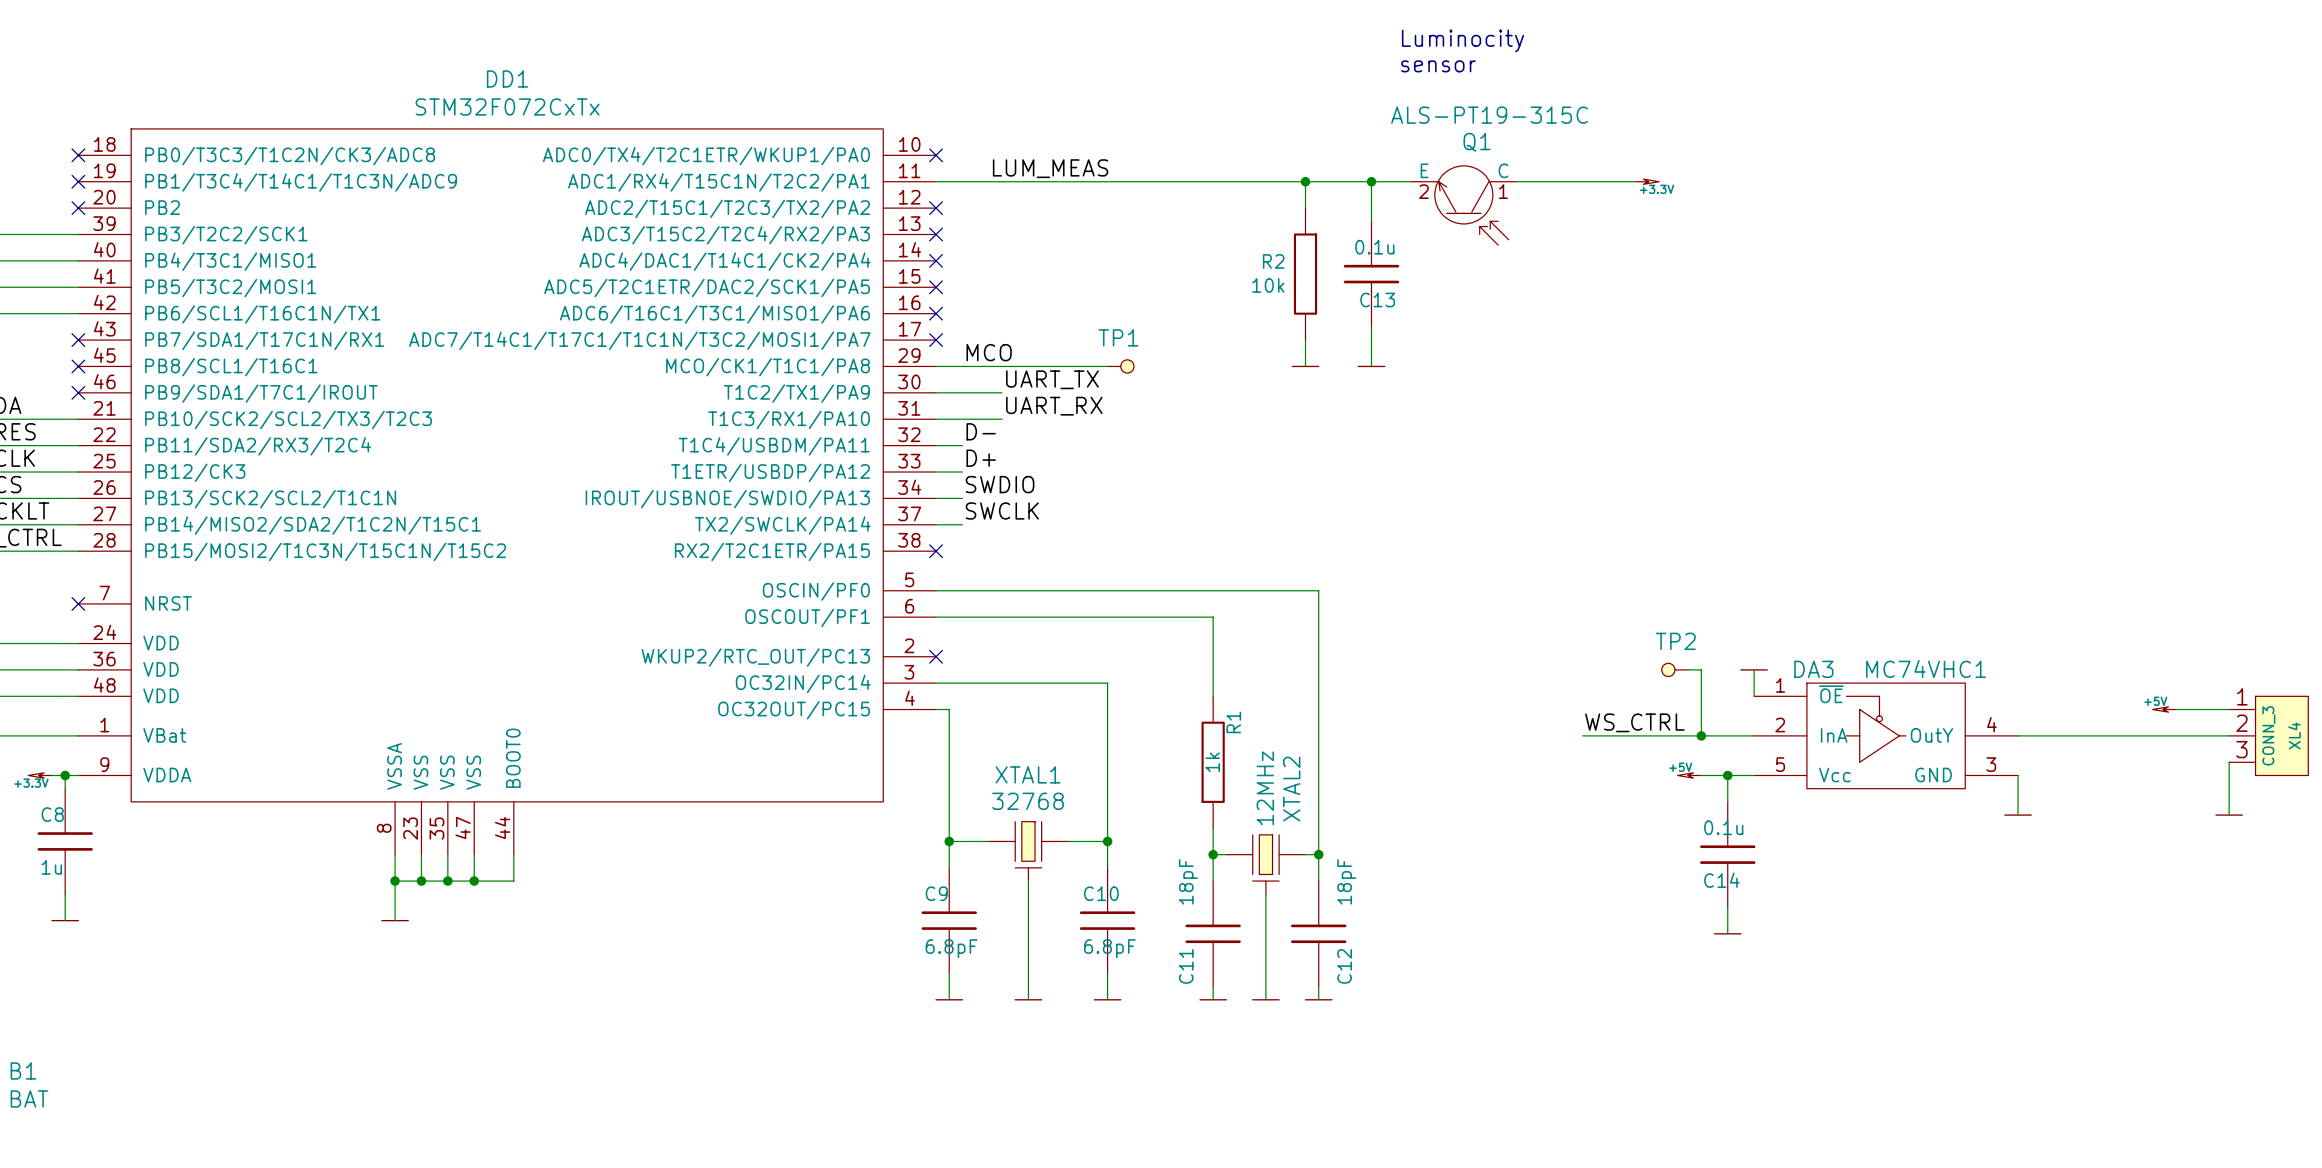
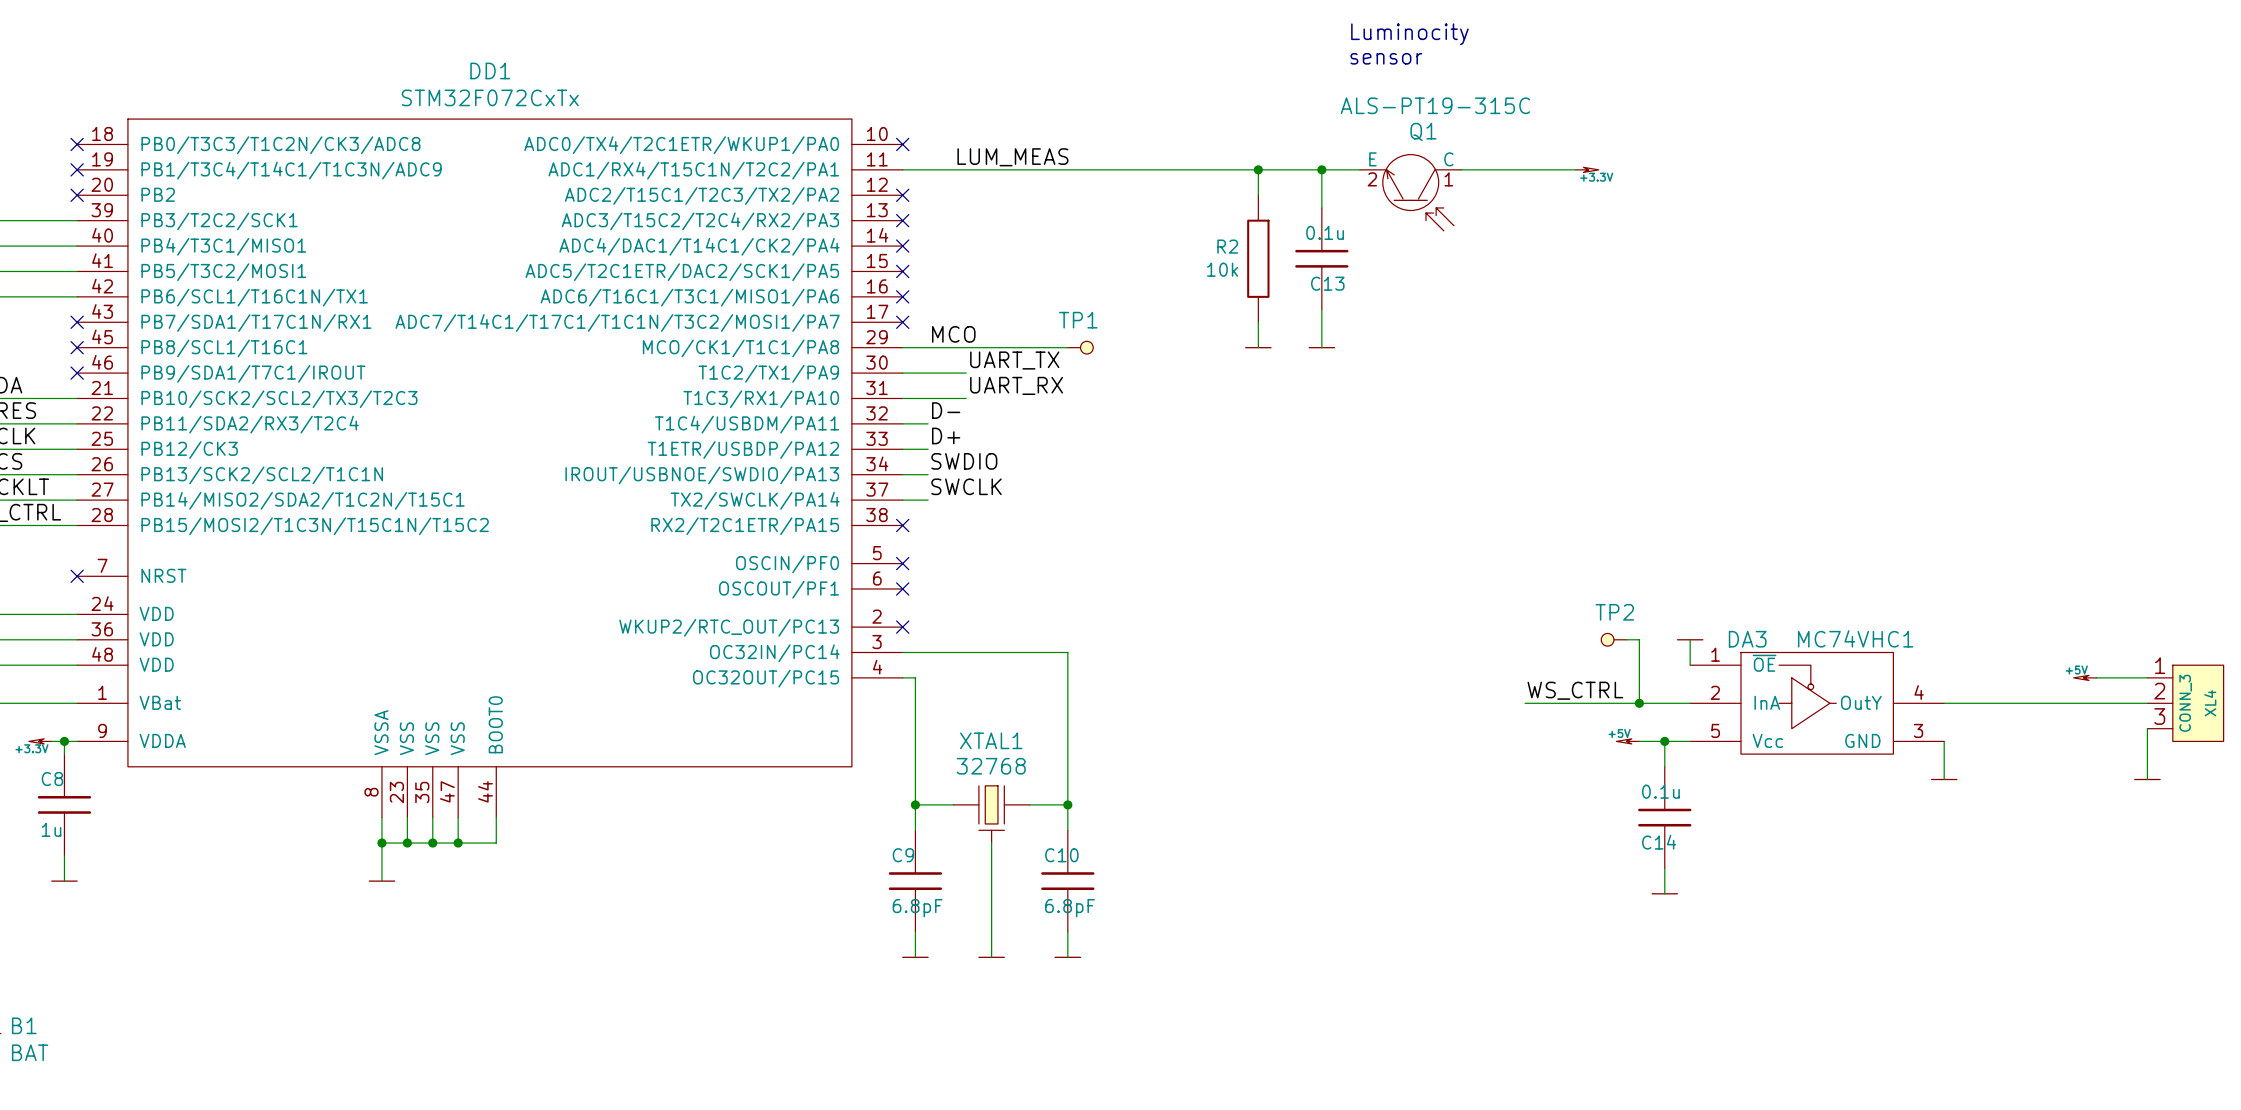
wire: (936, 590) (1318, 590) (1318, 881) -> none
no-connect mark: none -> (902, 563)
wire: (936, 617) (1213, 617) (1213, 696) -> none
no-connect mark: none -> (902, 588)
R1: 1k (1213, 762) -> none
wire: (1213, 828) (1213, 881) -> none
wire: (1213, 854) (1226, 854) -> none
junction: (1213, 854) -> none
wire: (1305, 854) (1318, 854) -> none
junction: (1318, 854) -> none
XTAL2: 12MHz (1265, 864) -> none
wire: (1265, 894) (1265, 999) -> none
C11: 18pF (1213, 933) -> none
C12: 18pF (1318, 933) -> none
wire: (1213, 986) (1213, 999) -> none
wire: (1318, 986) (1318, 999) -> none
power symbol: (1213, 999) -> none
power symbol: (1265, 999) -> none
power symbol: (1318, 999) -> none

